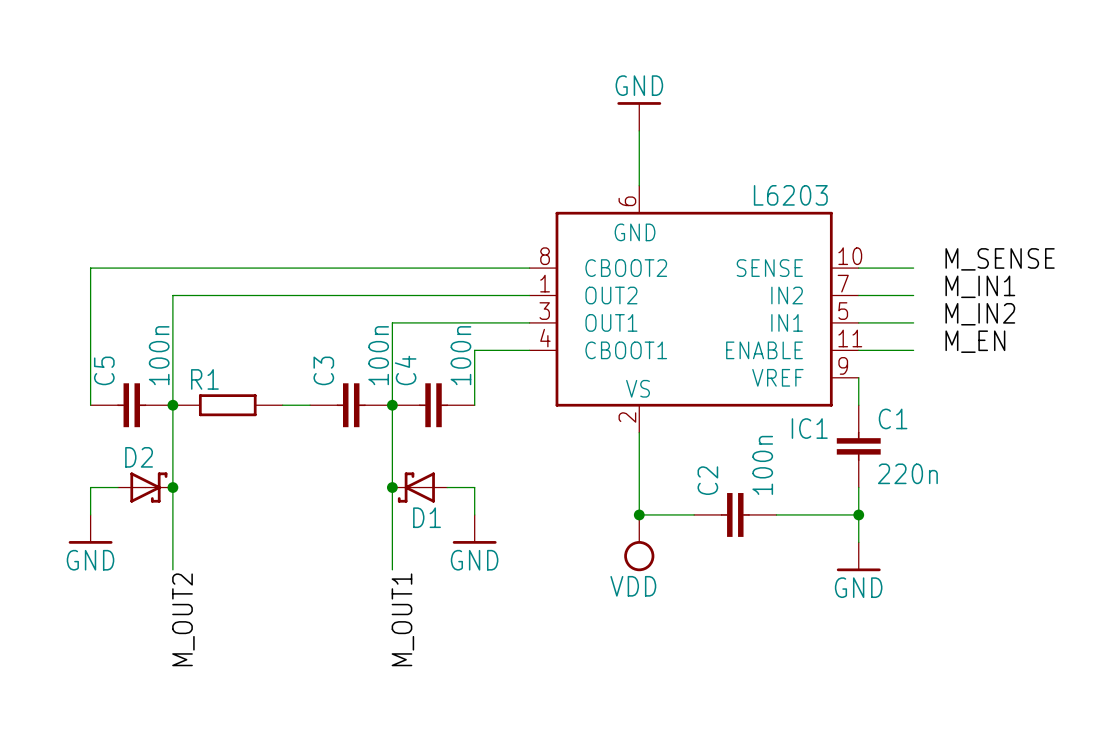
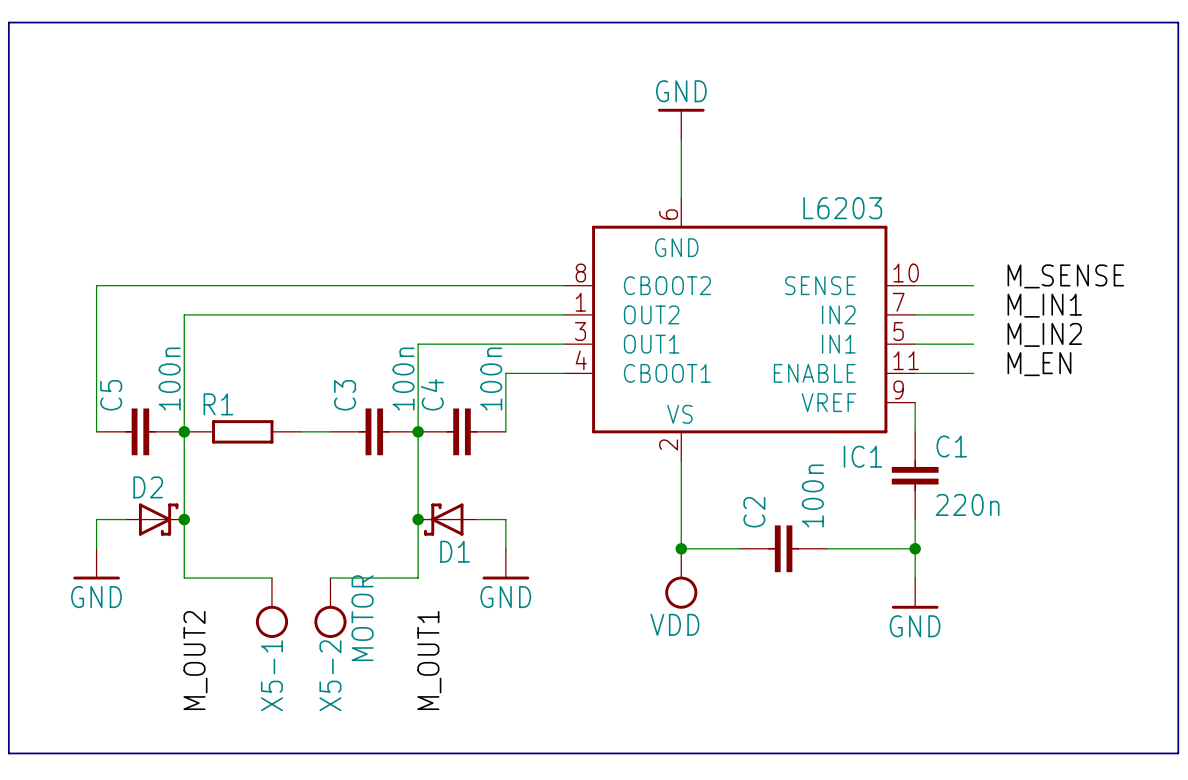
line: none -> (8, 22) (1178, 22) (1178, 753) (8, 753) (8, 22)
wire: (172, 542) (172, 569) -> (184, 578) (271, 578)
wire: (392, 542) (392, 569) -> (418, 578) (330, 578)
X5-1: none -> (271, 608)
X5-2: none -> MOTOR (330, 608)

